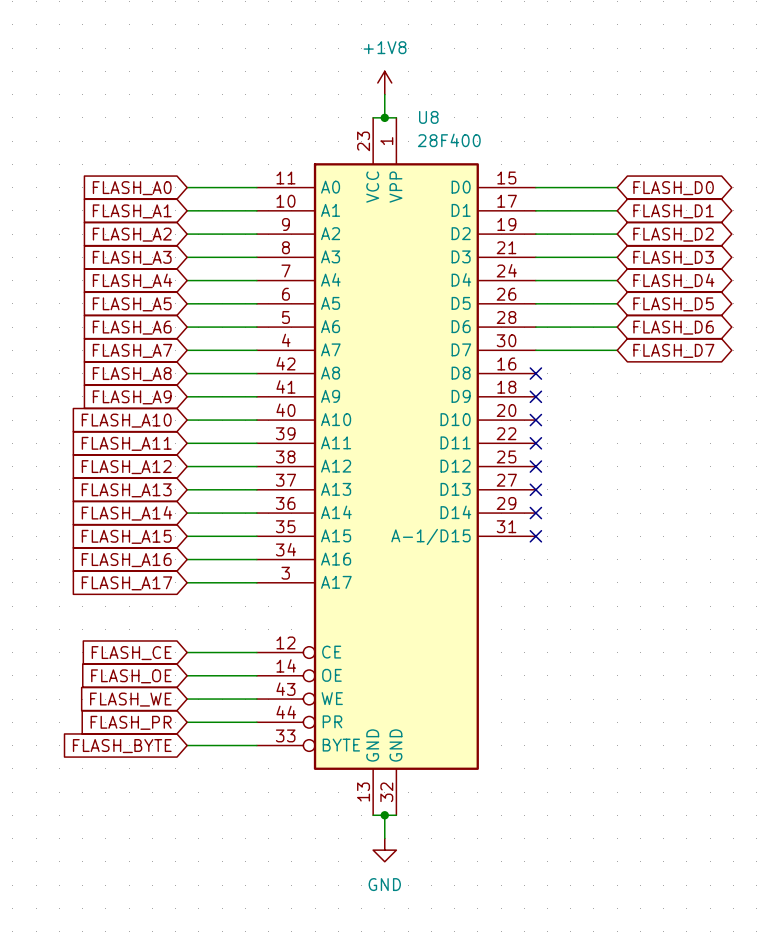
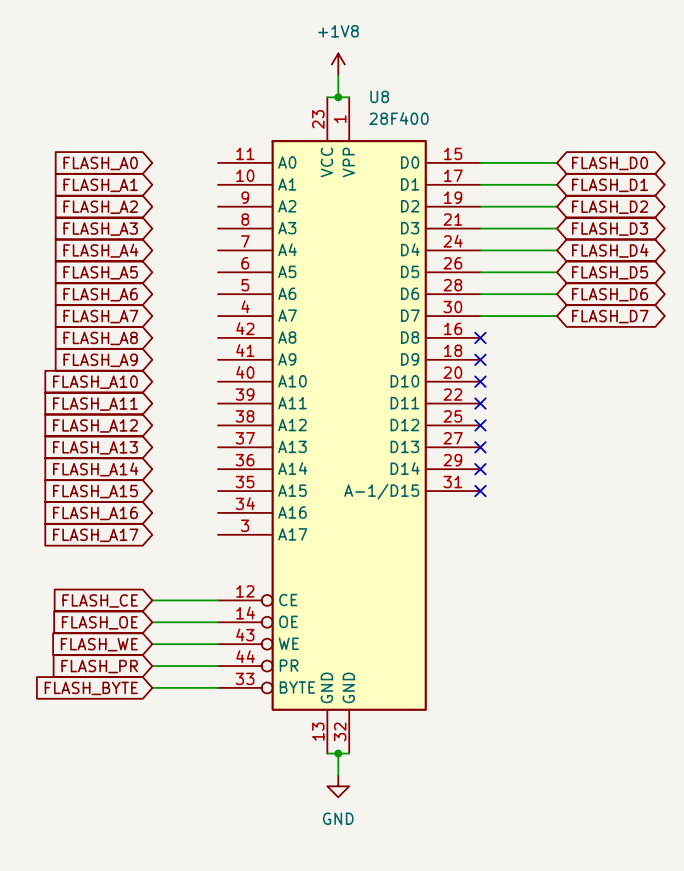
wire: (187, 187) (256, 187) -> none
wire: (187, 210) (256, 210) -> none
wire: (187, 234) (256, 234) -> none
wire: (187, 257) (256, 257) -> none
wire: (187, 280) (256, 280) -> none
wire: (187, 303) (256, 303) -> none
wire: (187, 327) (256, 327) -> none
wire: (187, 350) (256, 350) -> none
wire: (187, 373) (256, 373) -> none
wire: (187, 396) (256, 396) -> none
wire: (187, 420) (256, 420) -> none
wire: (187, 443) (256, 443) -> none
wire: (187, 466) (256, 466) -> none
wire: (187, 489) (256, 489) -> none
wire: (187, 513) (256, 513) -> none
wire: (187, 536) (256, 536) -> none
wire: (187, 559) (256, 559) -> none
wire: (187, 582) (256, 582) -> none

